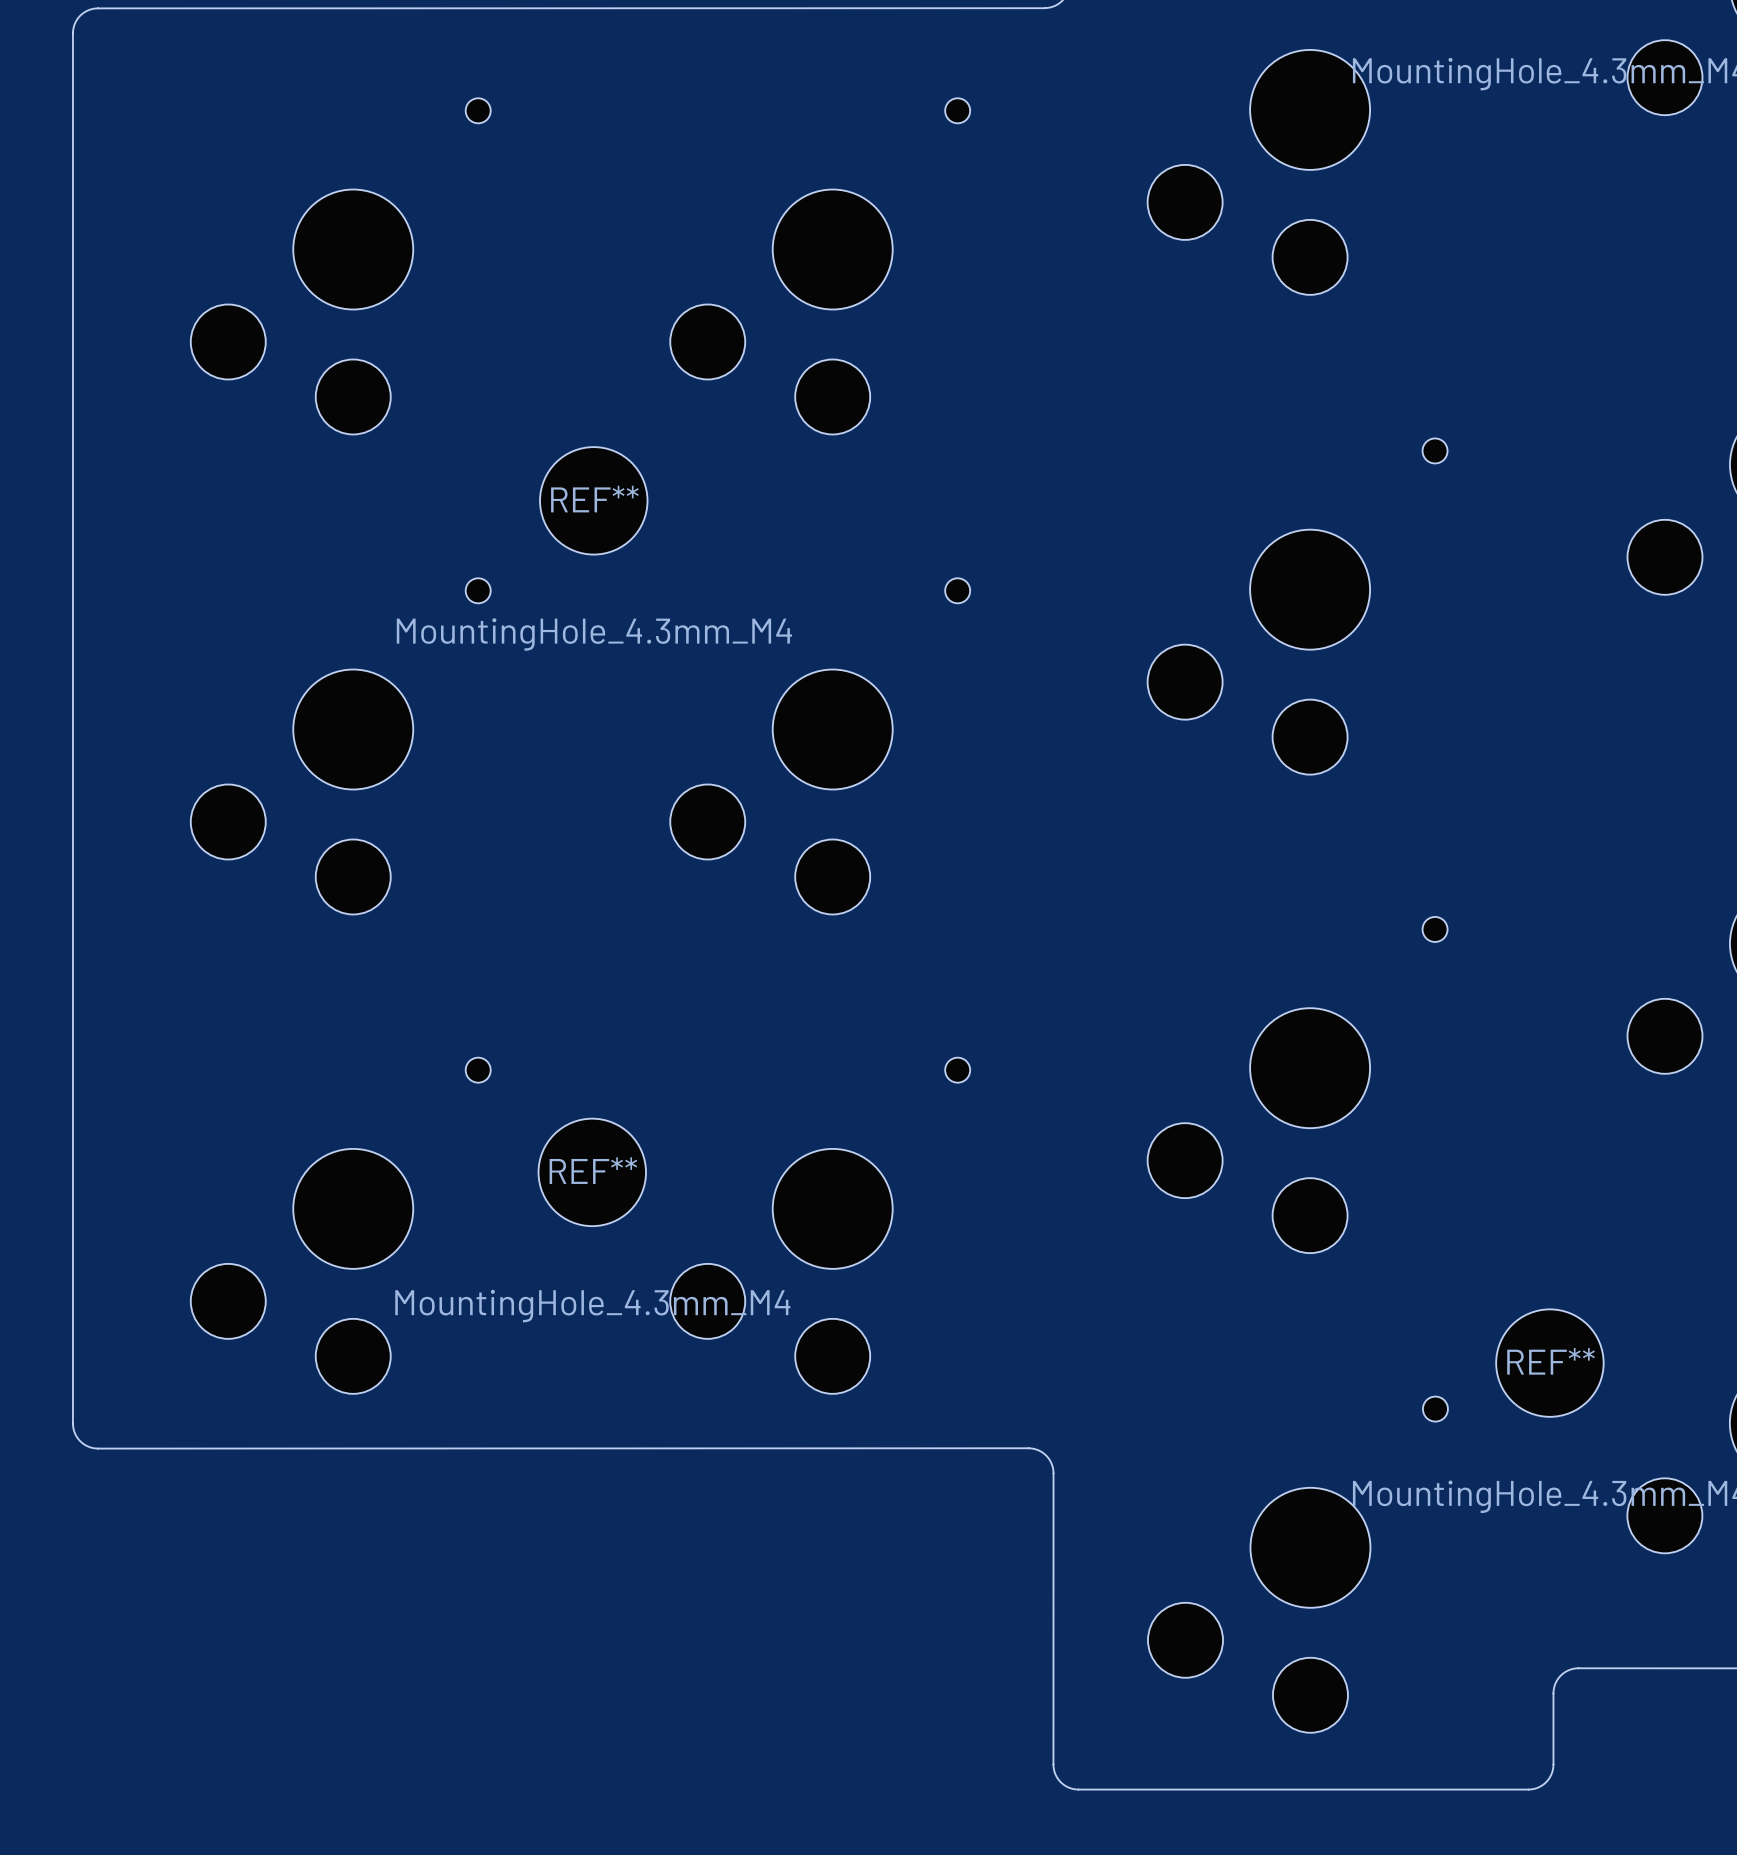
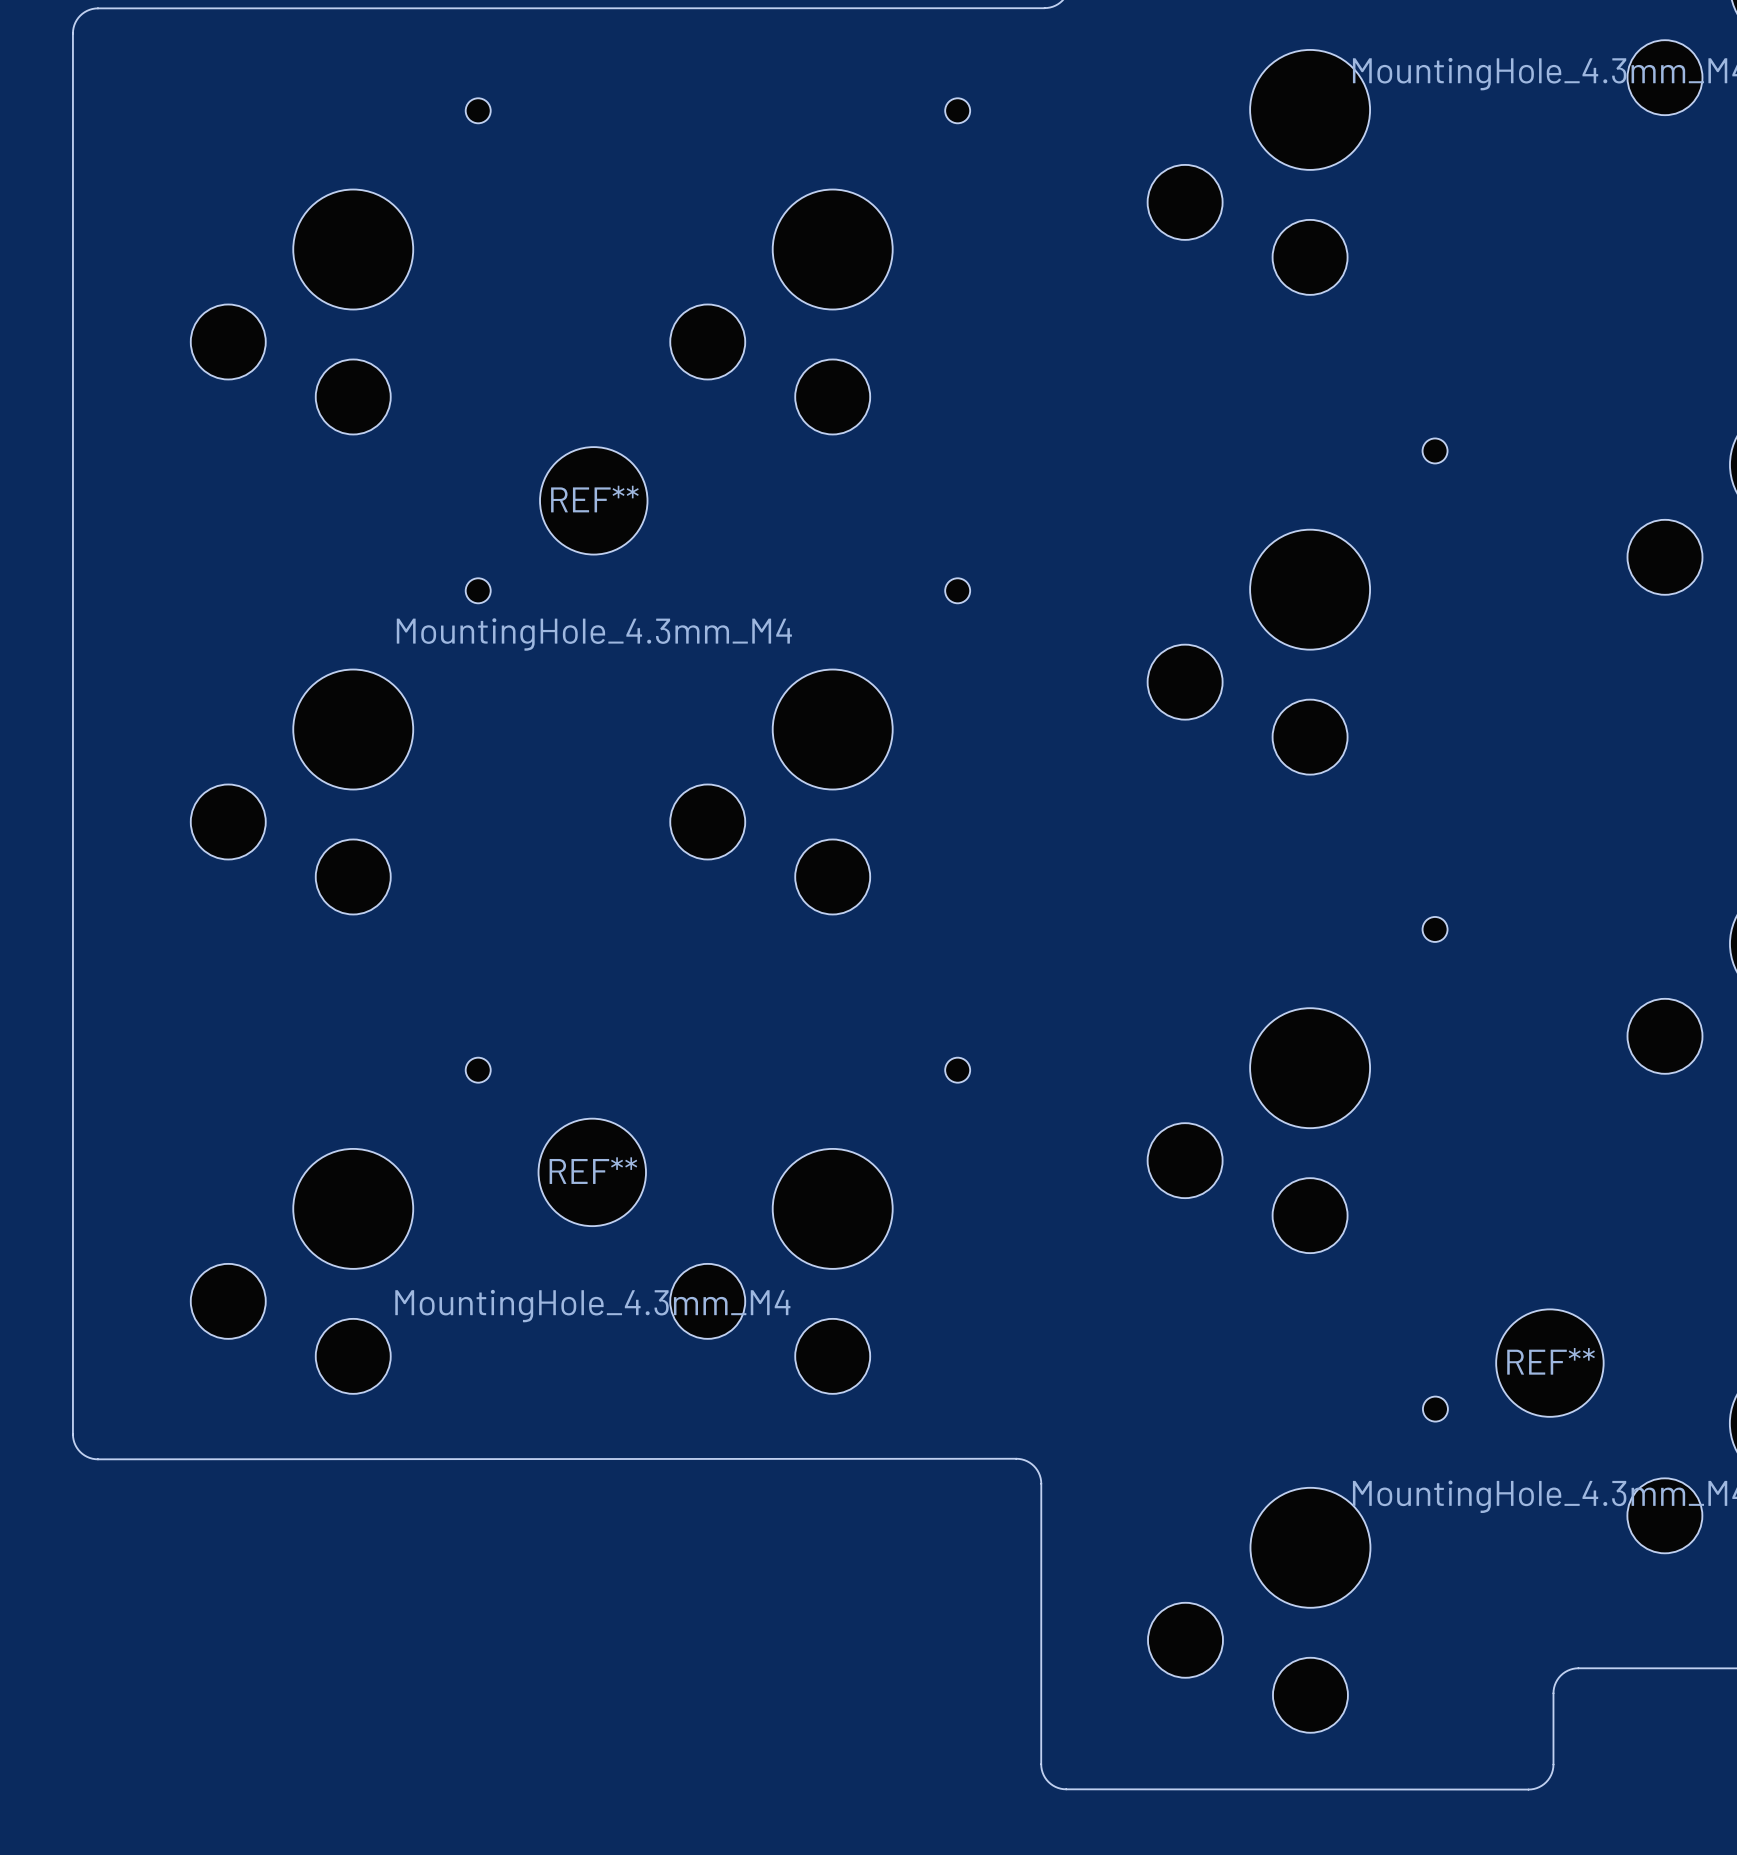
board edge: (72, 1423) (74, 1431) (80, 1441) (87, 1446) (97, 1448) (1034, 1448) (1046, 1455) (1053, 1470) (1053, 1764) (1057, 1777) (1065, 1785) (1078, 1789) (1528, 1789) -> (72, 1423) (73, 1437) (76, 1447) (87, 1456) (97, 1459) (1021, 1459) (1035, 1468) (1041, 1480) (1041, 1764) (1043, 1775) (1052, 1785) (1066, 1789) (1528, 1789)

